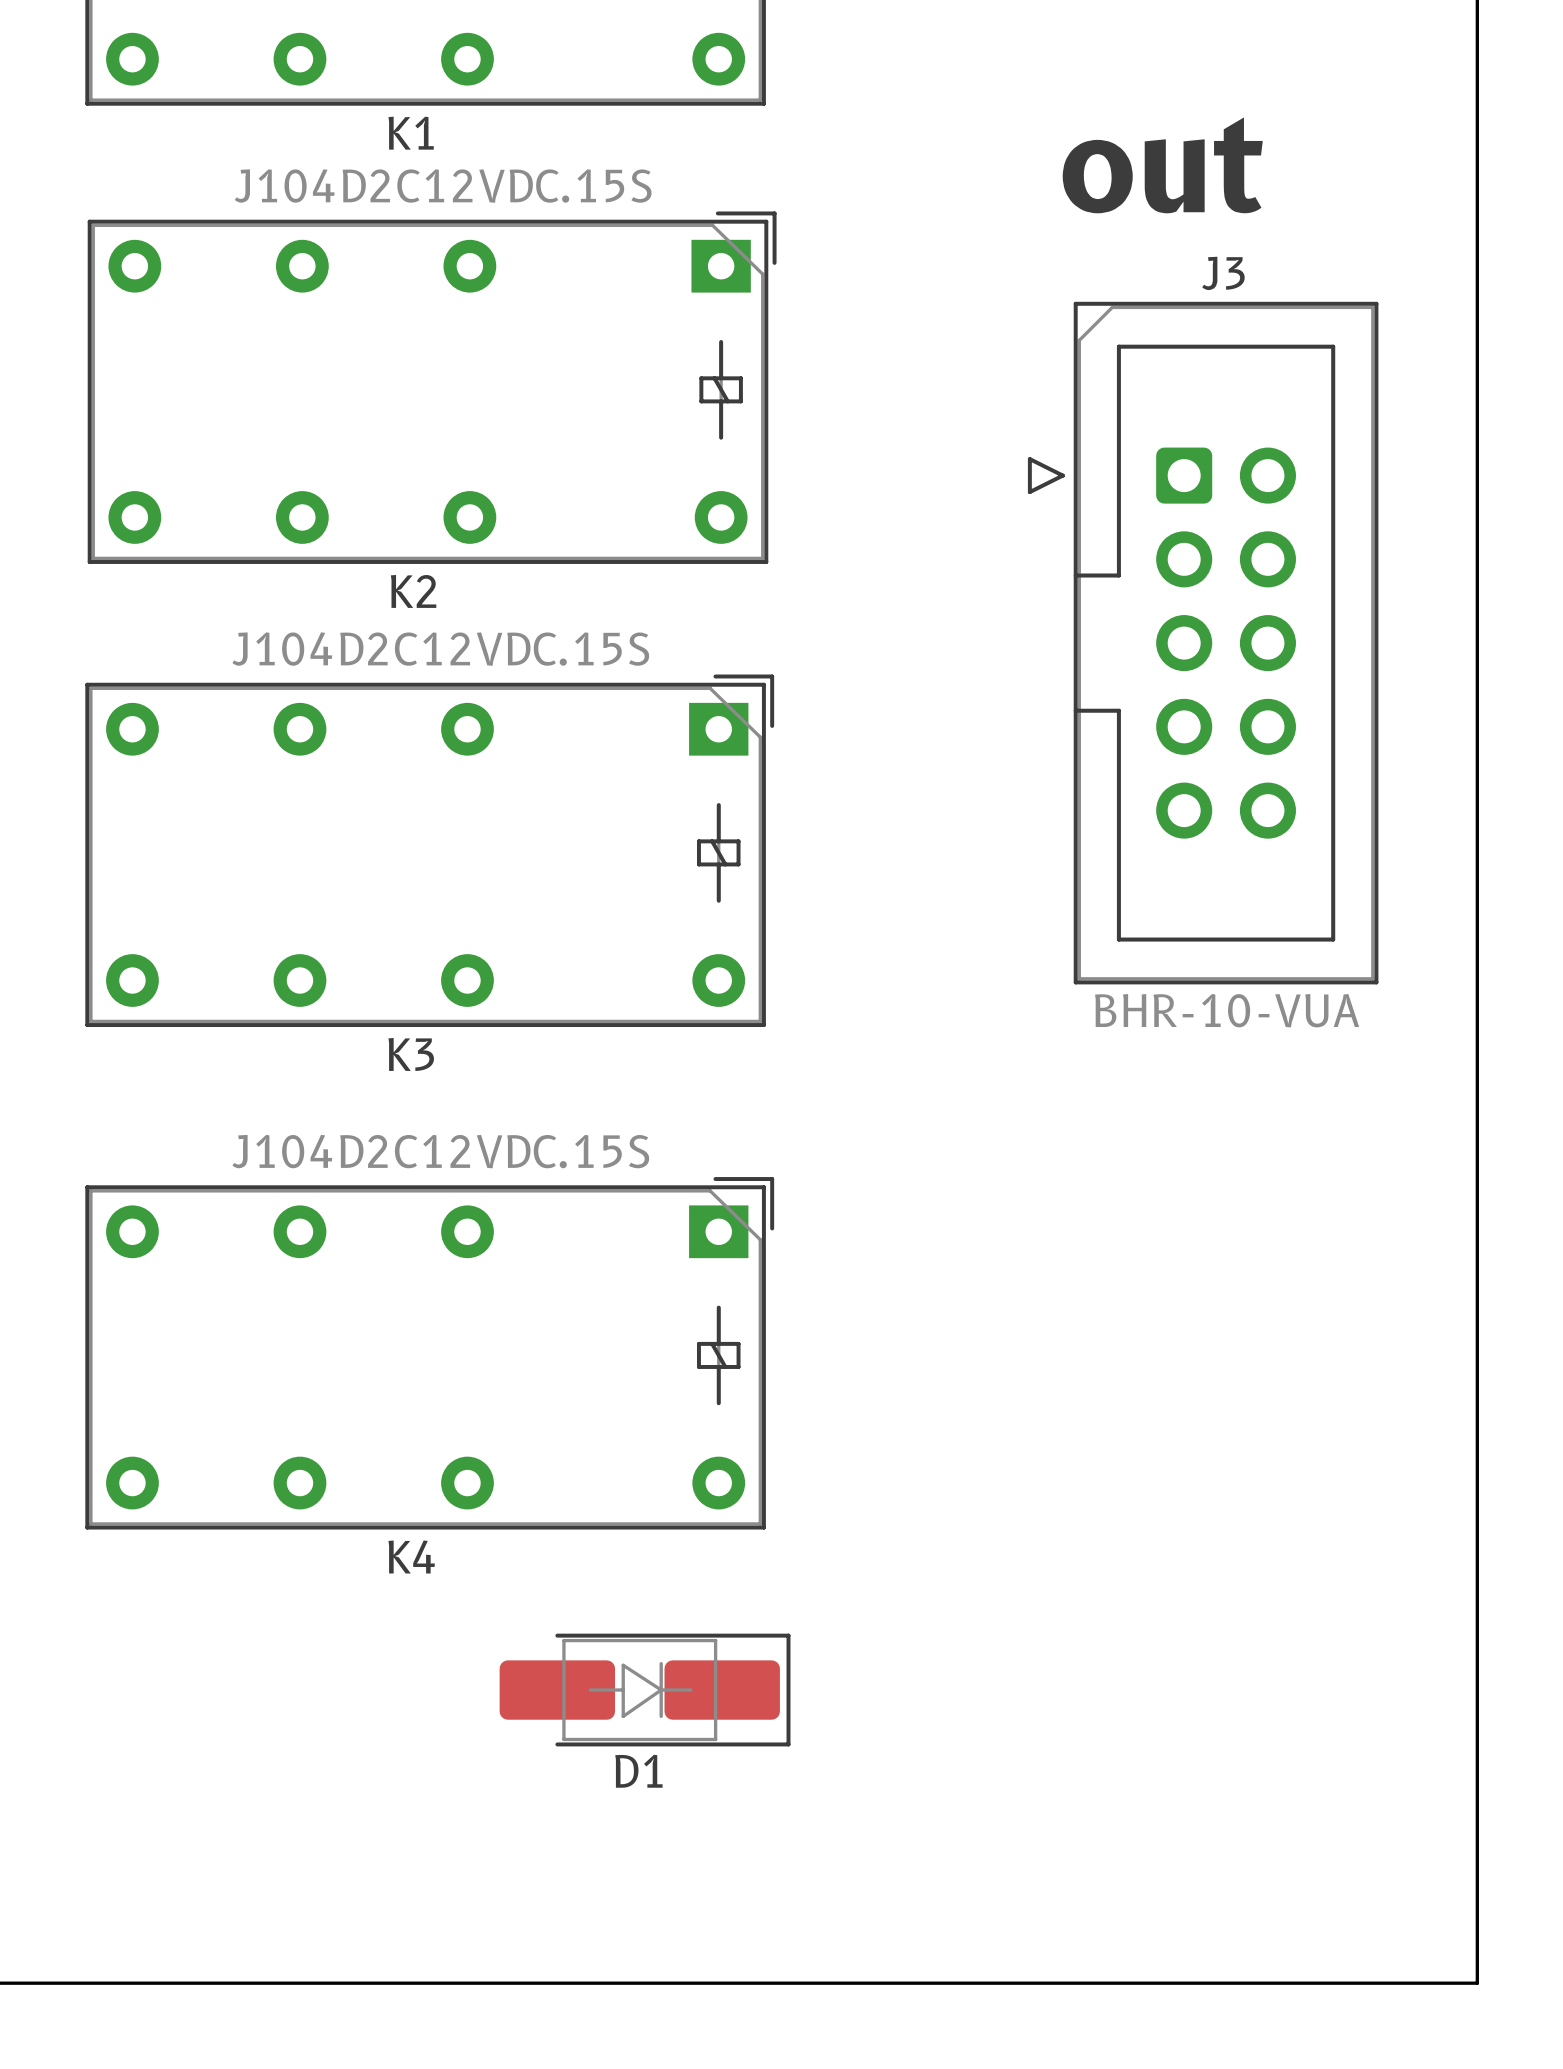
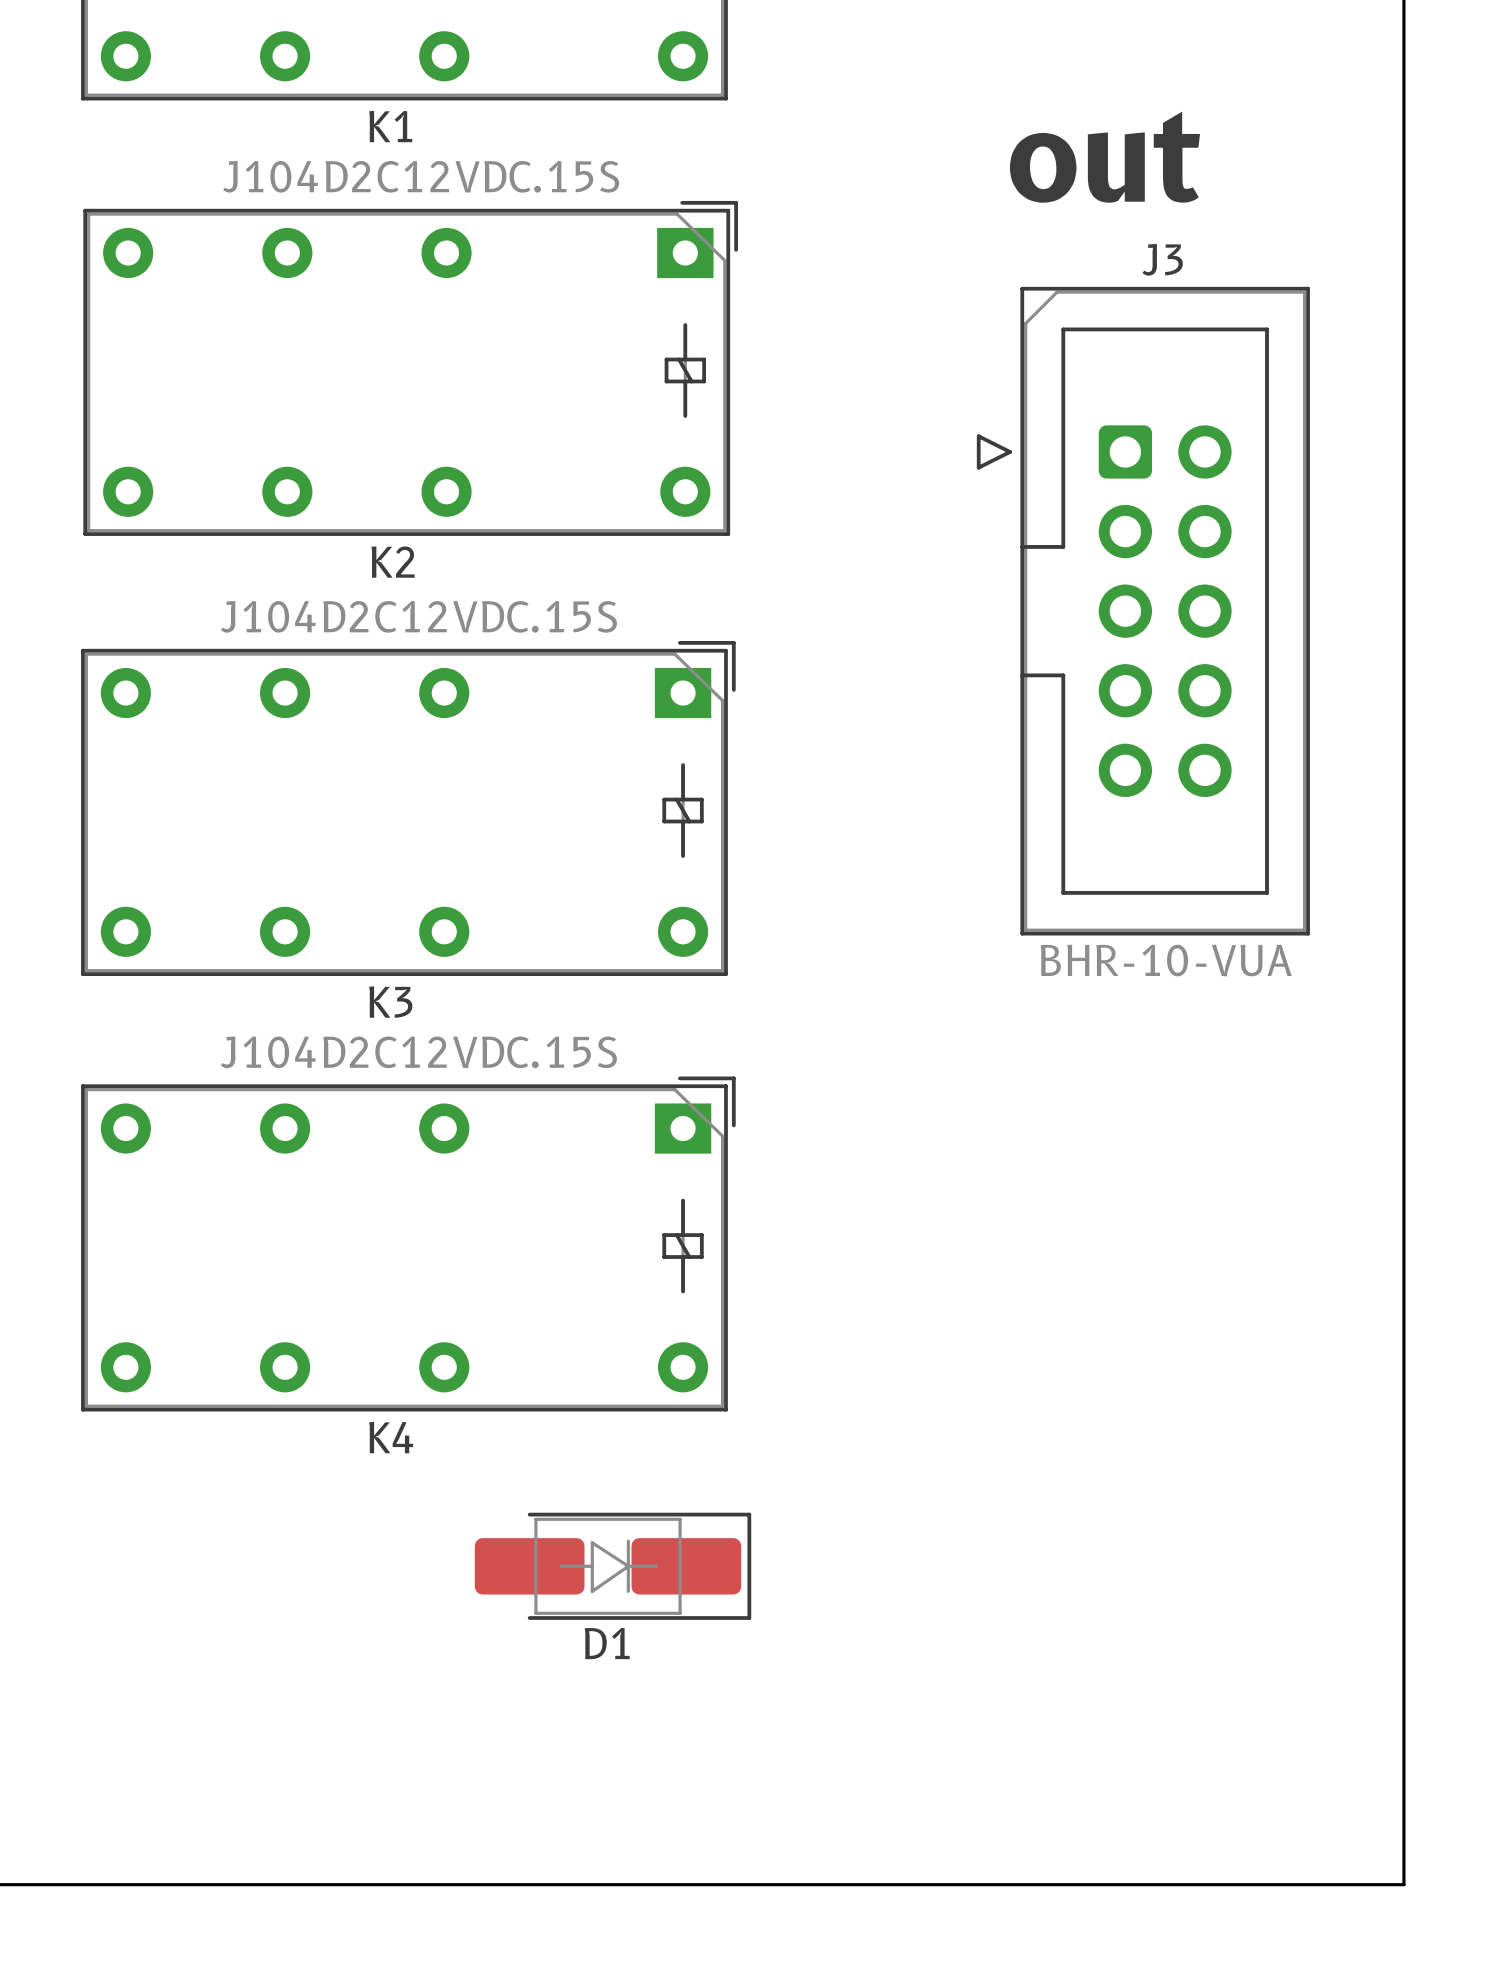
K4 position: (429, 1353) -> (408, 1244)
D1 position: (645, 1690) -> (613, 1566)

